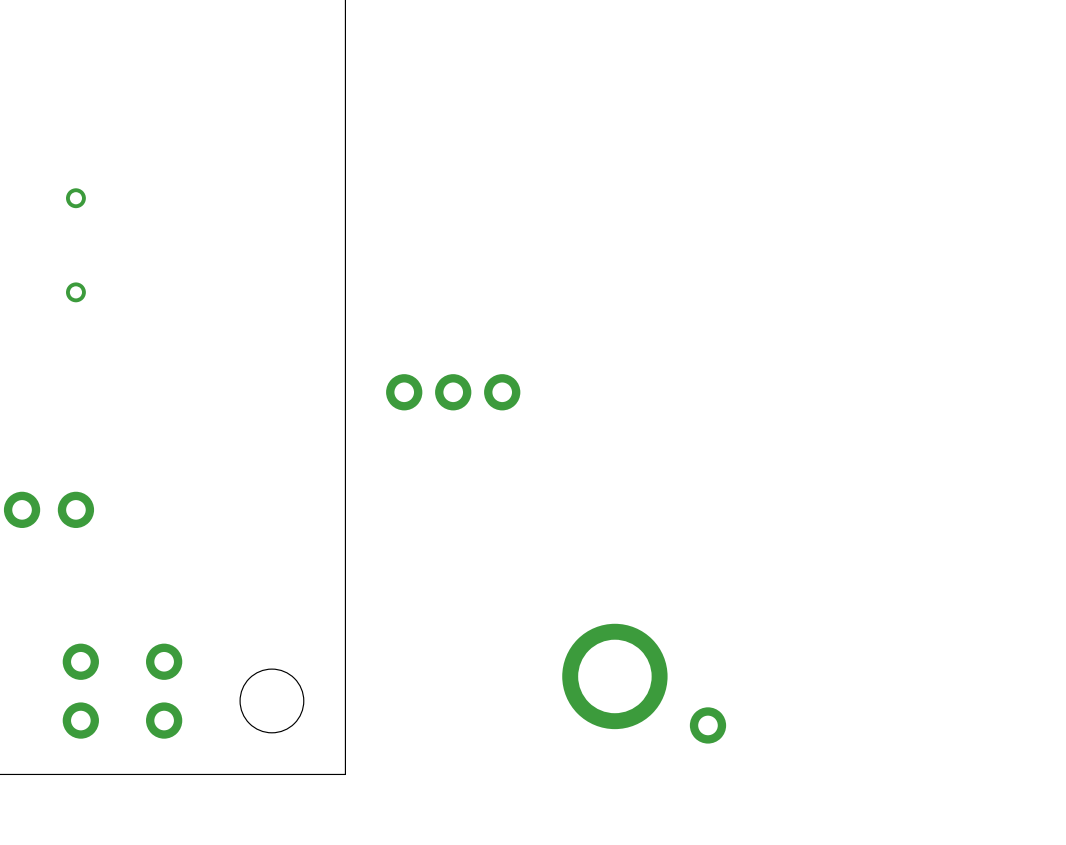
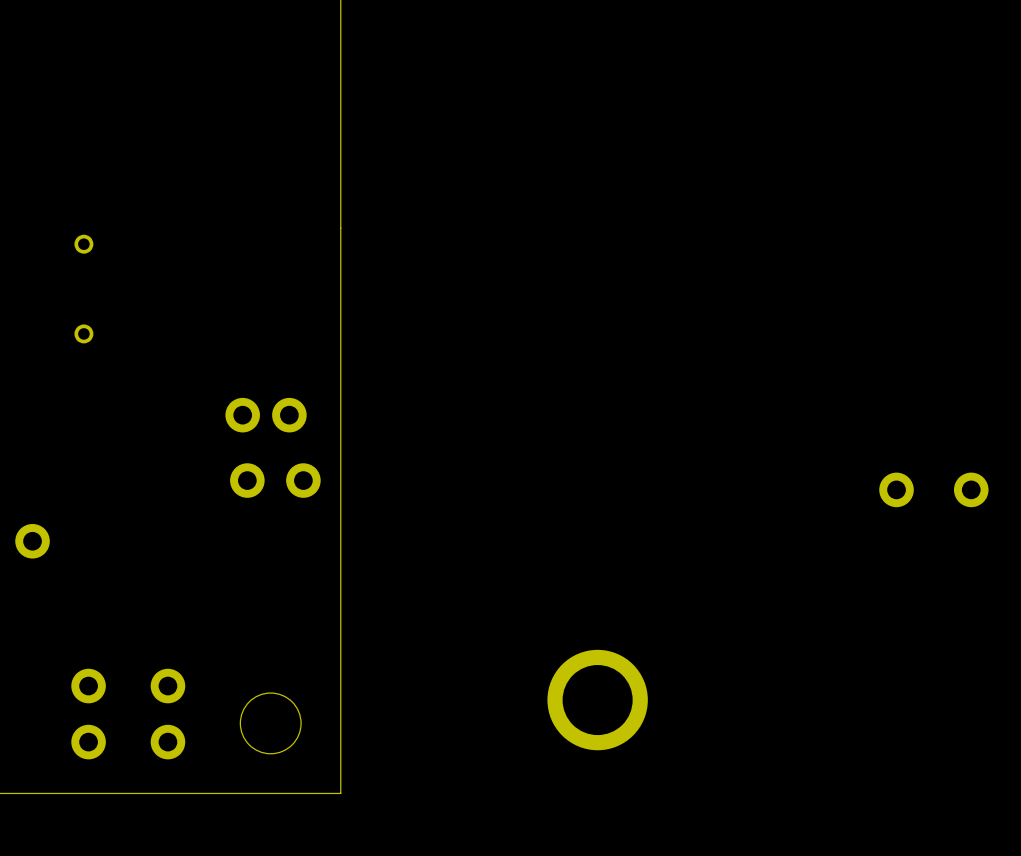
part: none -> (266, 415)
part: (453, 392) -> none
part: none -> (247, 480)
part: none -> (303, 480)
part: none -> (896, 489)
part: none -> (971, 489)
part: (75, 509) -> none
part: (707, 725) -> none

